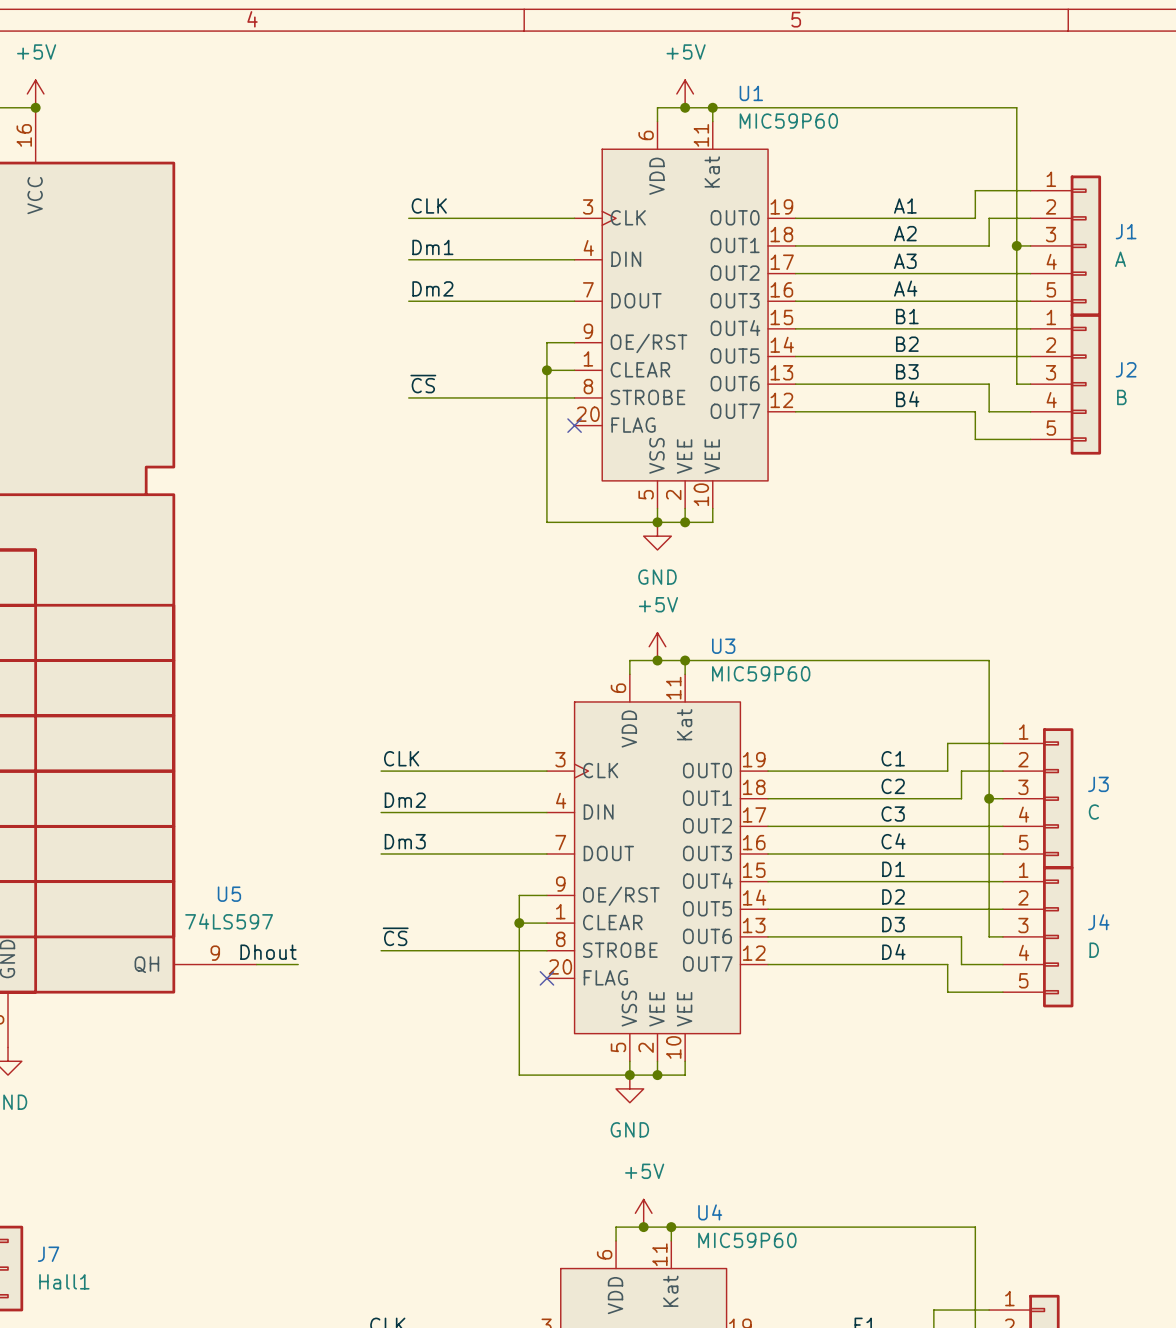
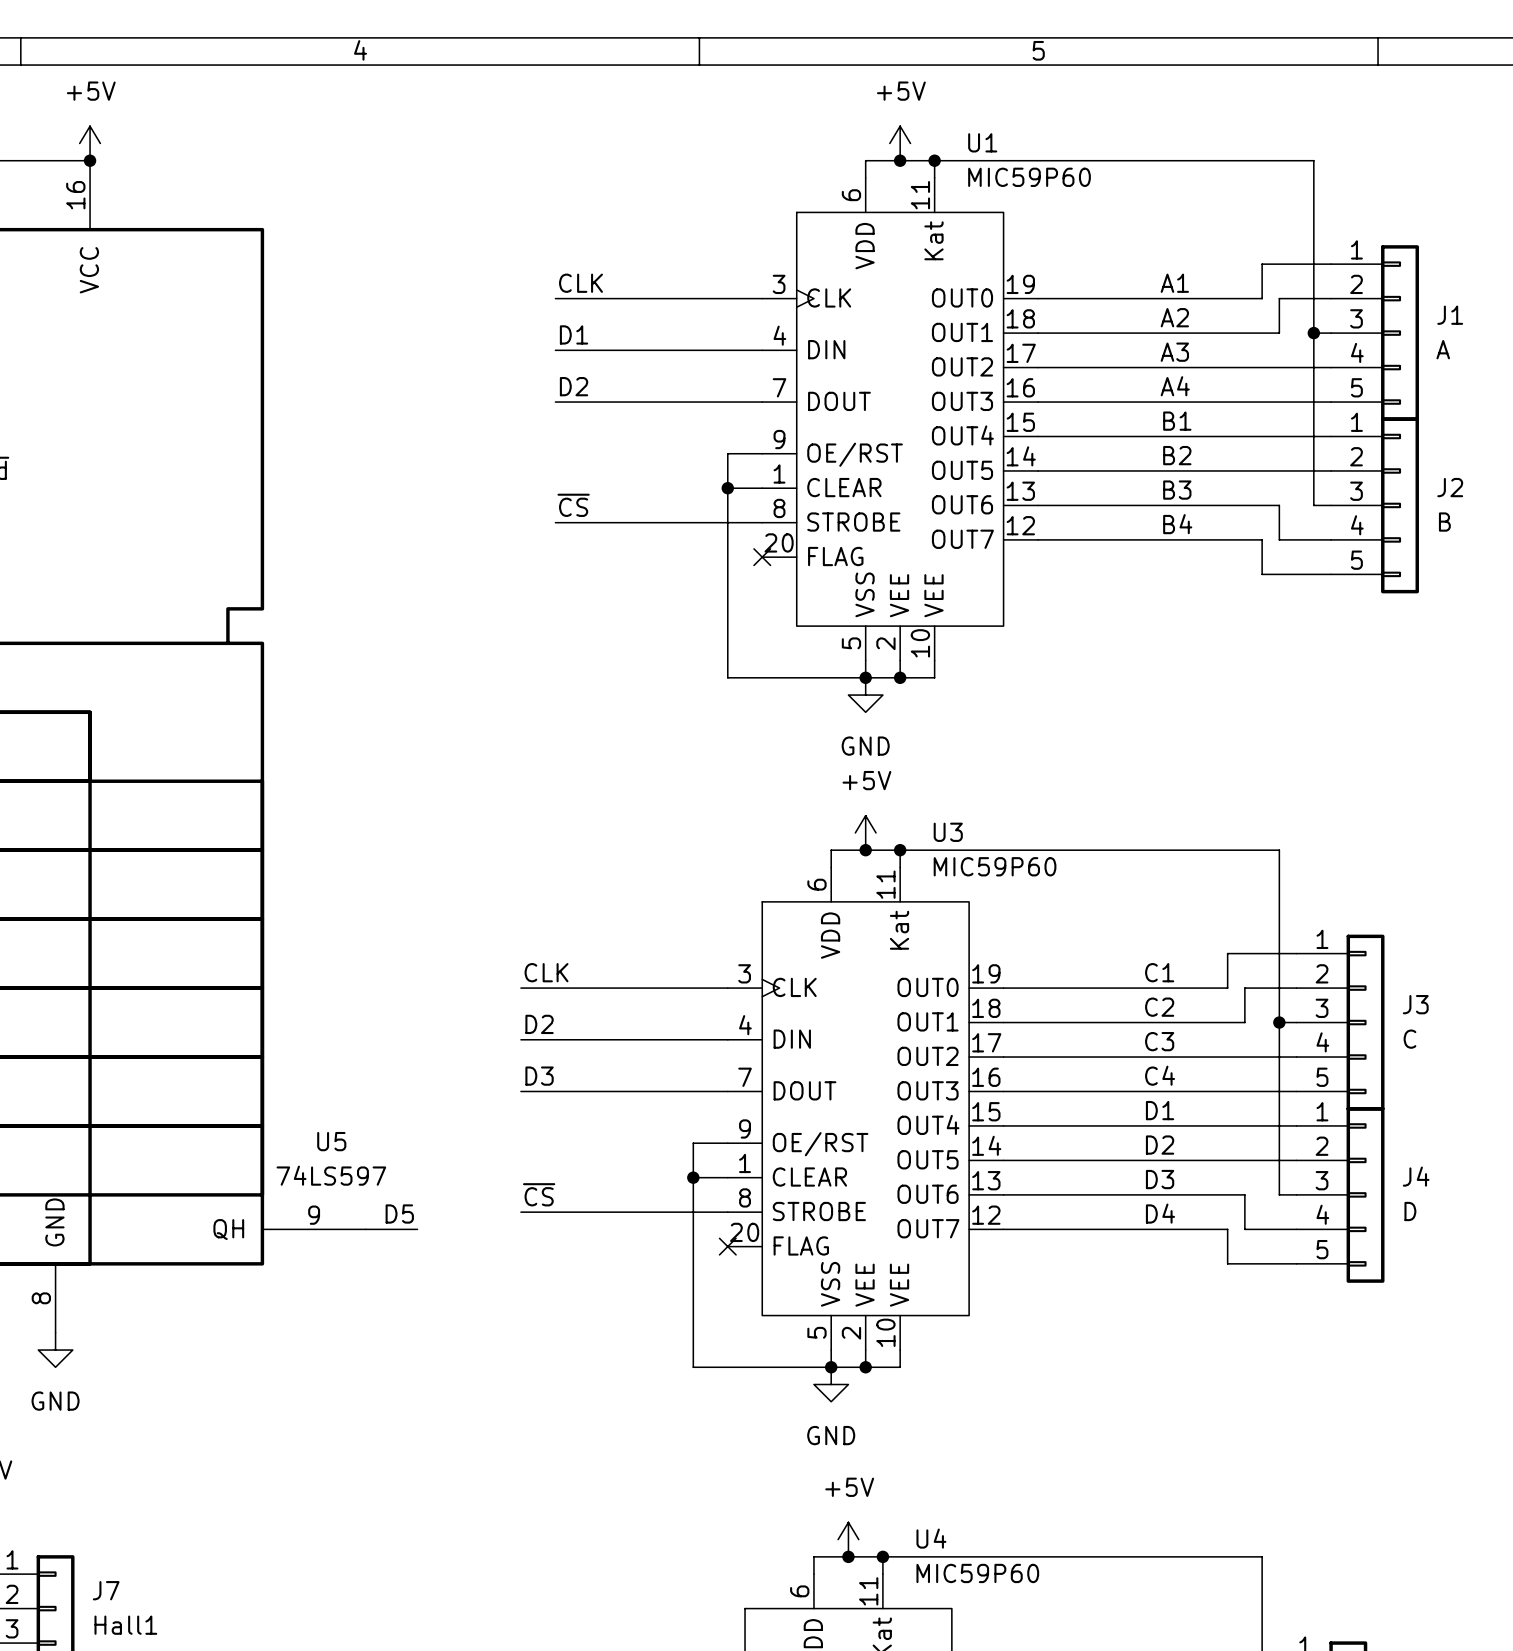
label: Dm1 (432, 247) -> D1 (574, 334)
label: Dm2 (432, 288) -> D2 (574, 386)
label: Dm2 (405, 800) -> D2 (539, 1024)
label: Dm3 (405, 841) -> D3 (539, 1076)
label: Dhout (268, 952) -> D5 (399, 1214)

